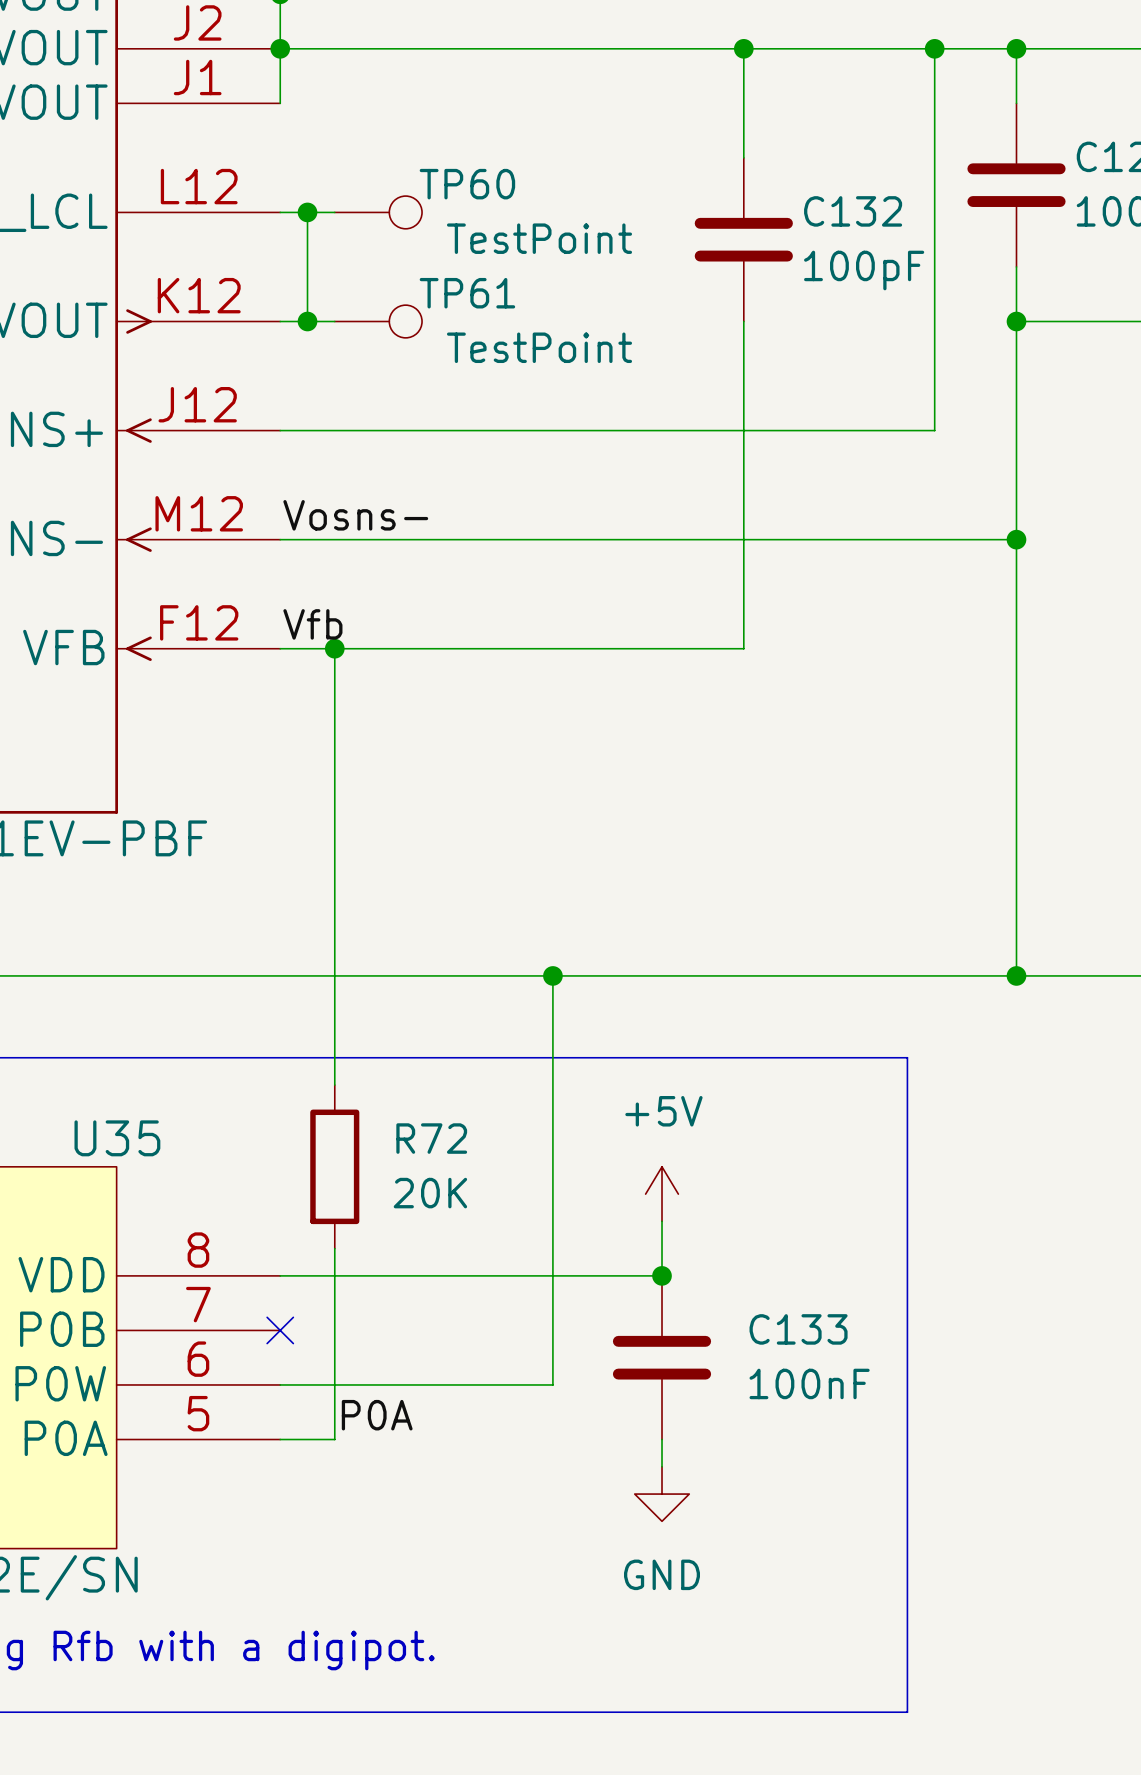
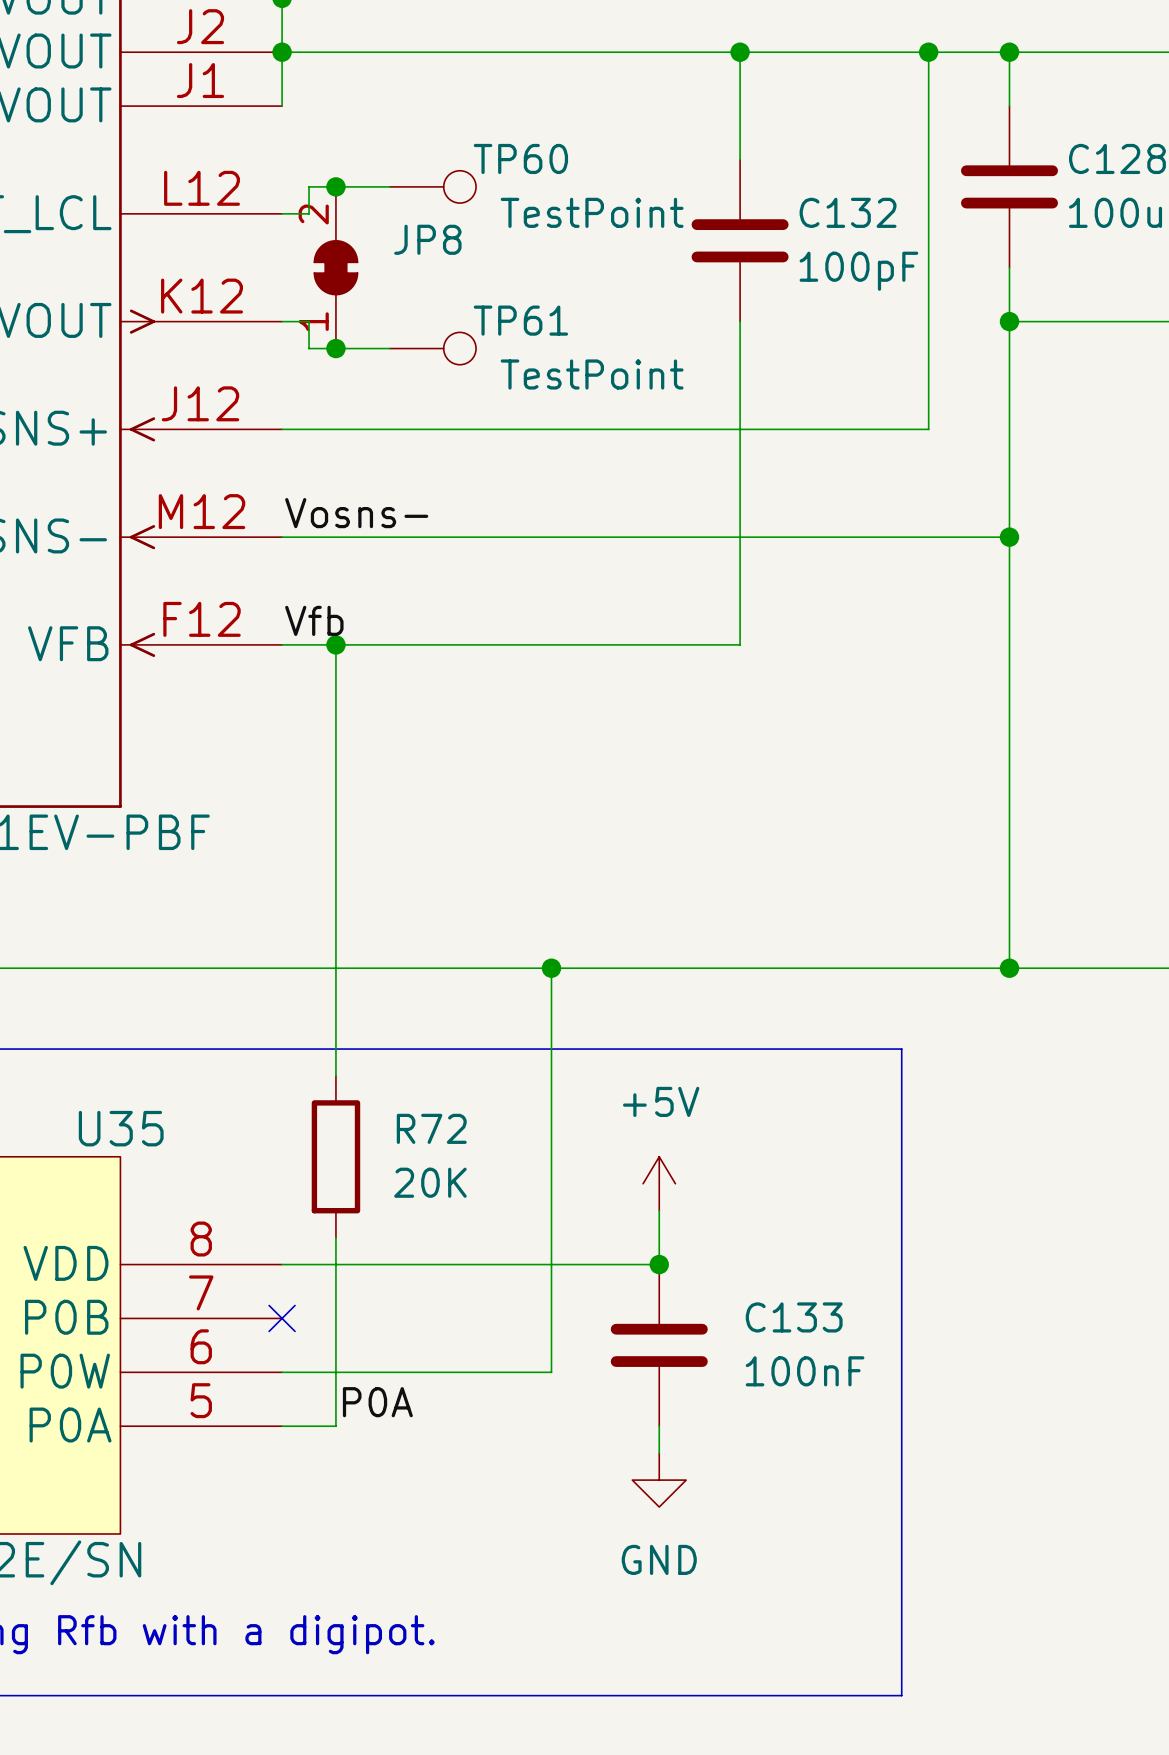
wire: none -> (389, 186) (309, 186) (309, 213)
junction position: (307, 212) -> (335, 186)
wire: (334, 212) (307, 212) (307, 321) (334, 321) -> none
TP60 position: (378, 212) -> (432, 186)
JP8: none -> (335, 267)
wire: none -> (309, 321) (309, 348) (389, 348)
junction position: (307, 321) -> (335, 348)
TP61 position: (378, 321) -> (432, 348)

